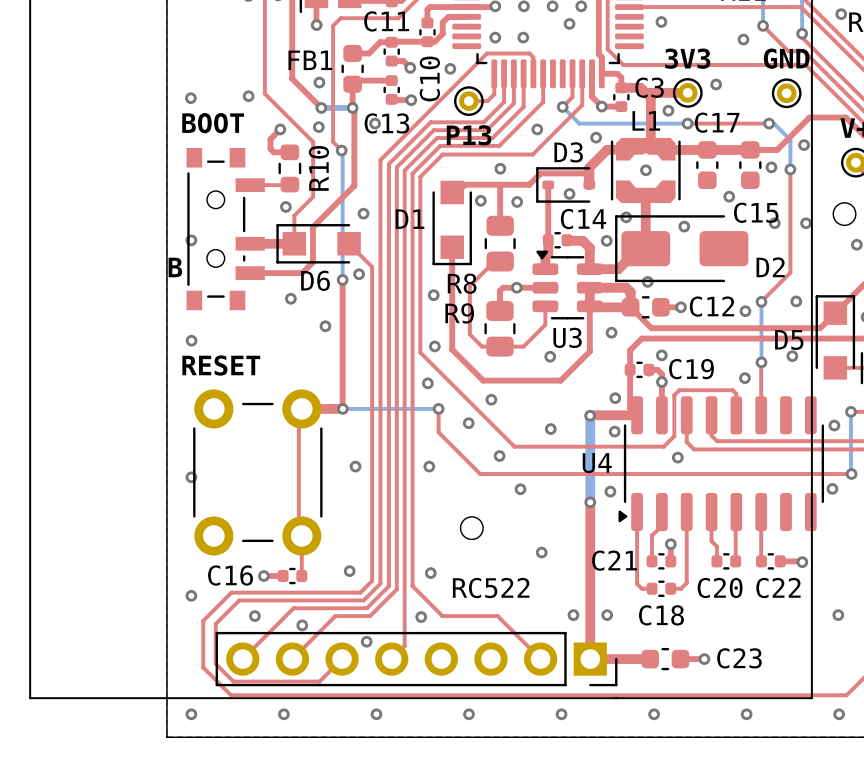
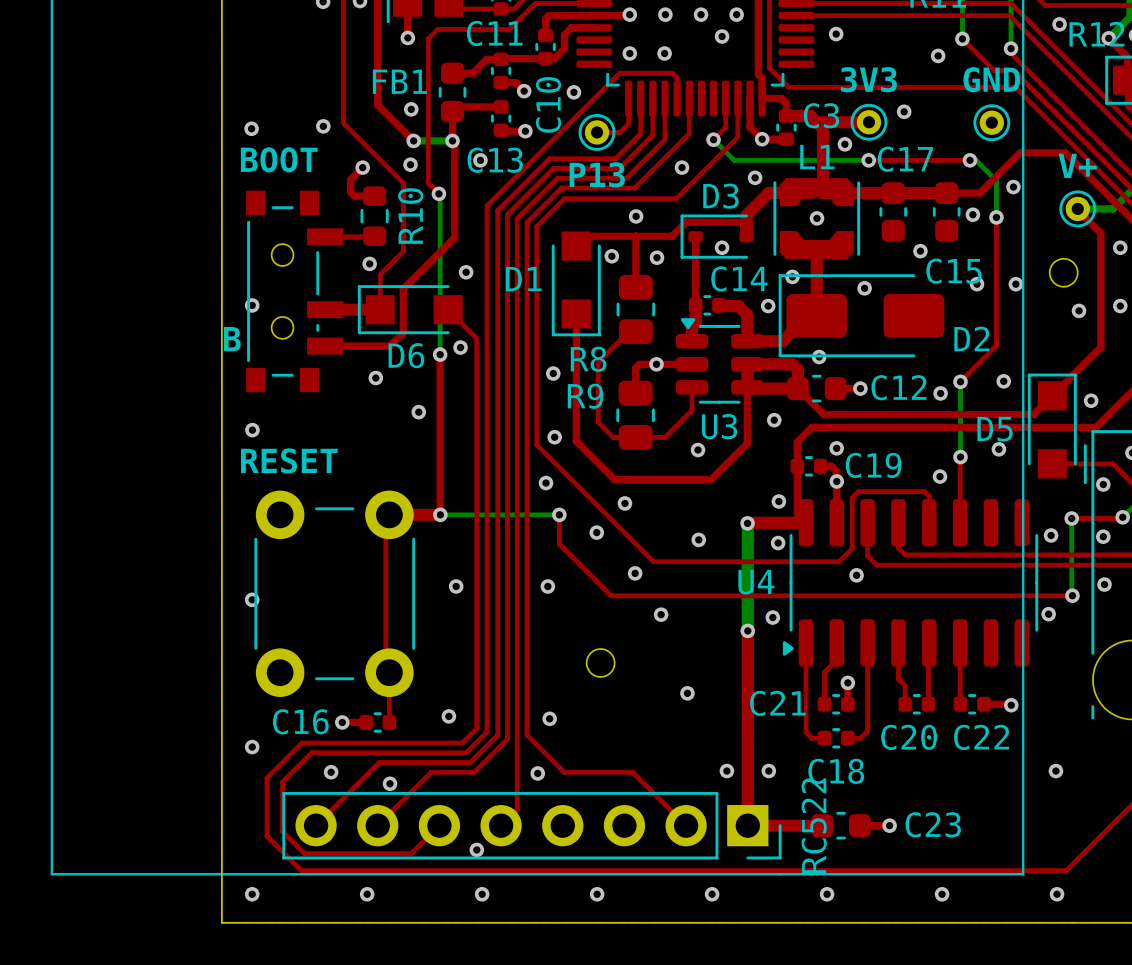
RC522 name rotation: 0° (491, 588) -> 90° counterclockwise (814, 825)
RC522 name position: RC522 (491, 588) -> RC522 (814, 825)
via position: (366, 641) -> (476, 849)

